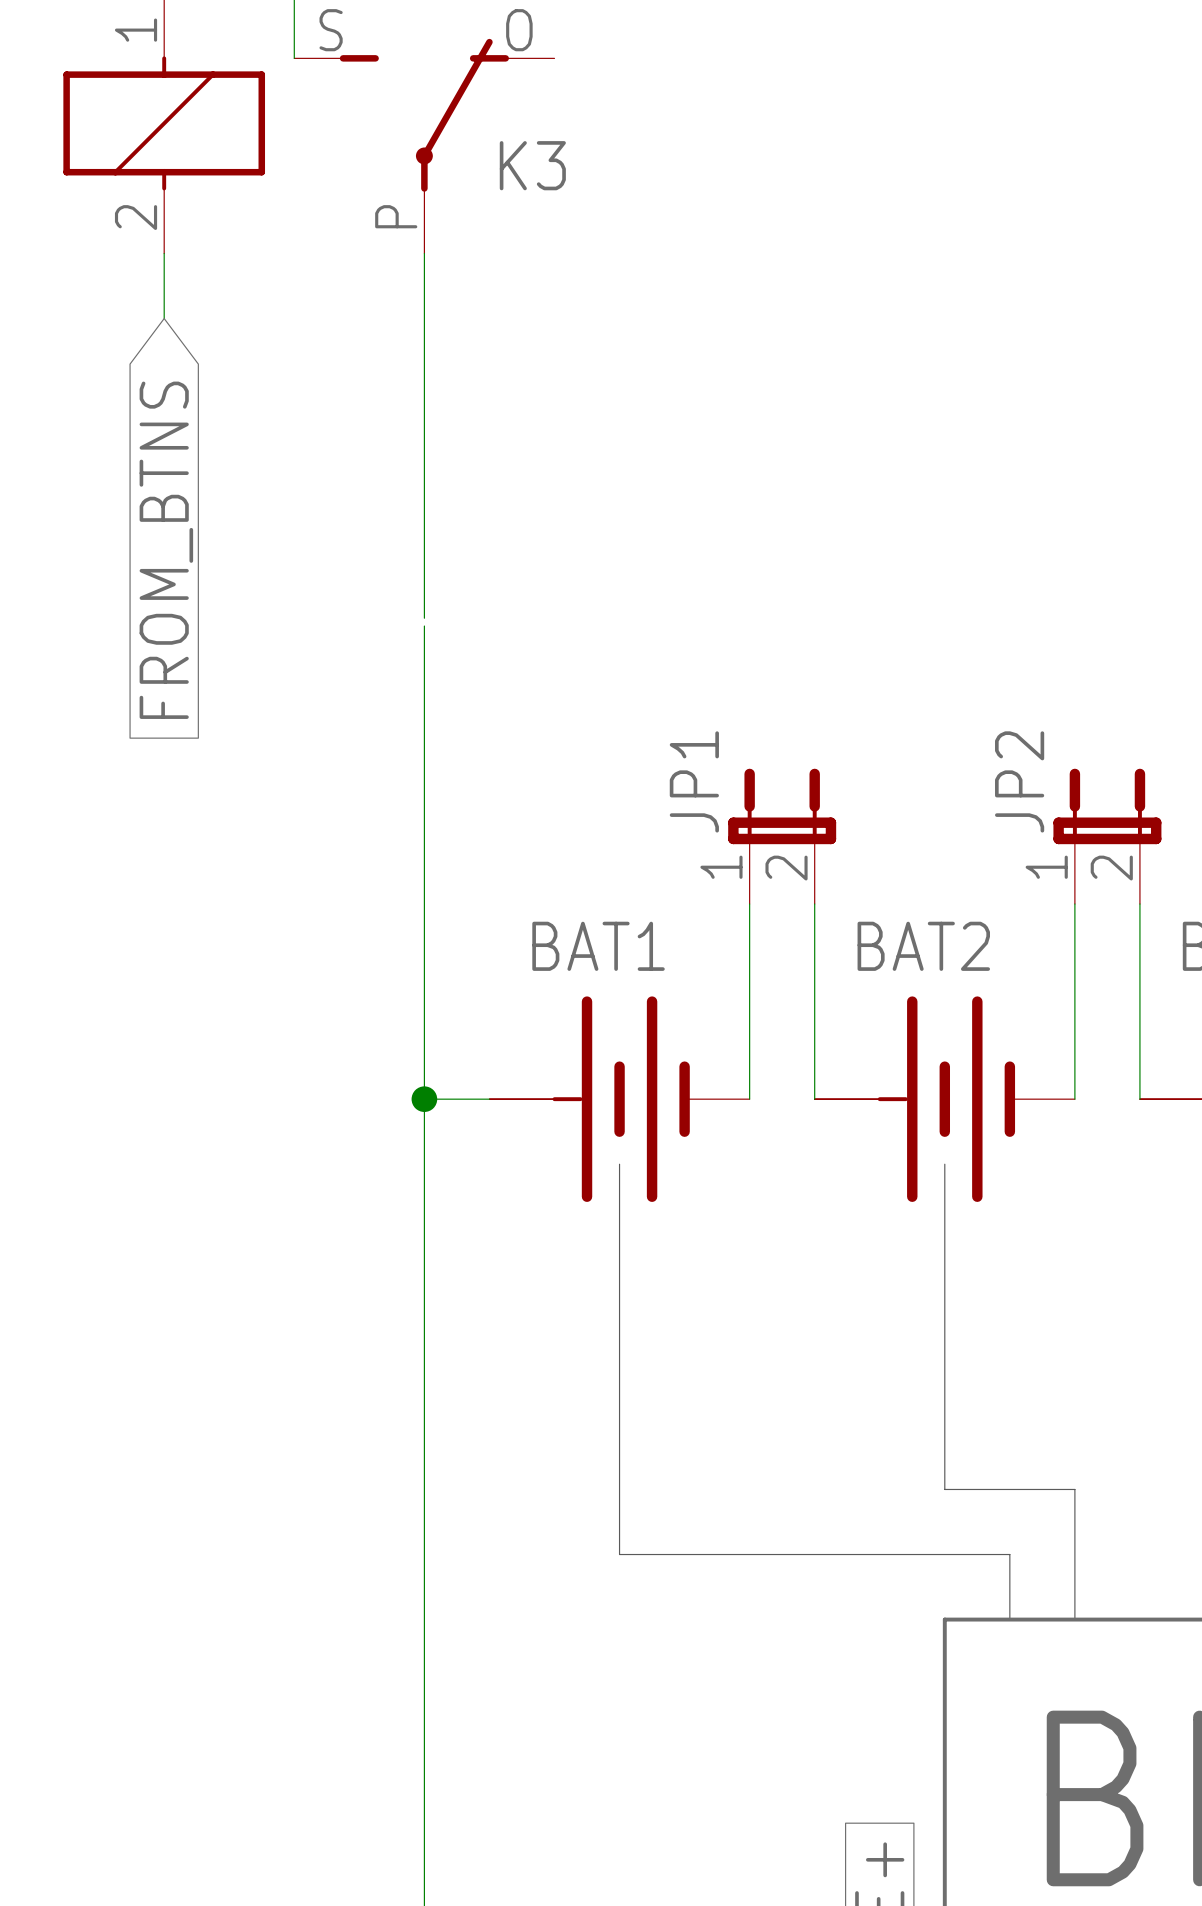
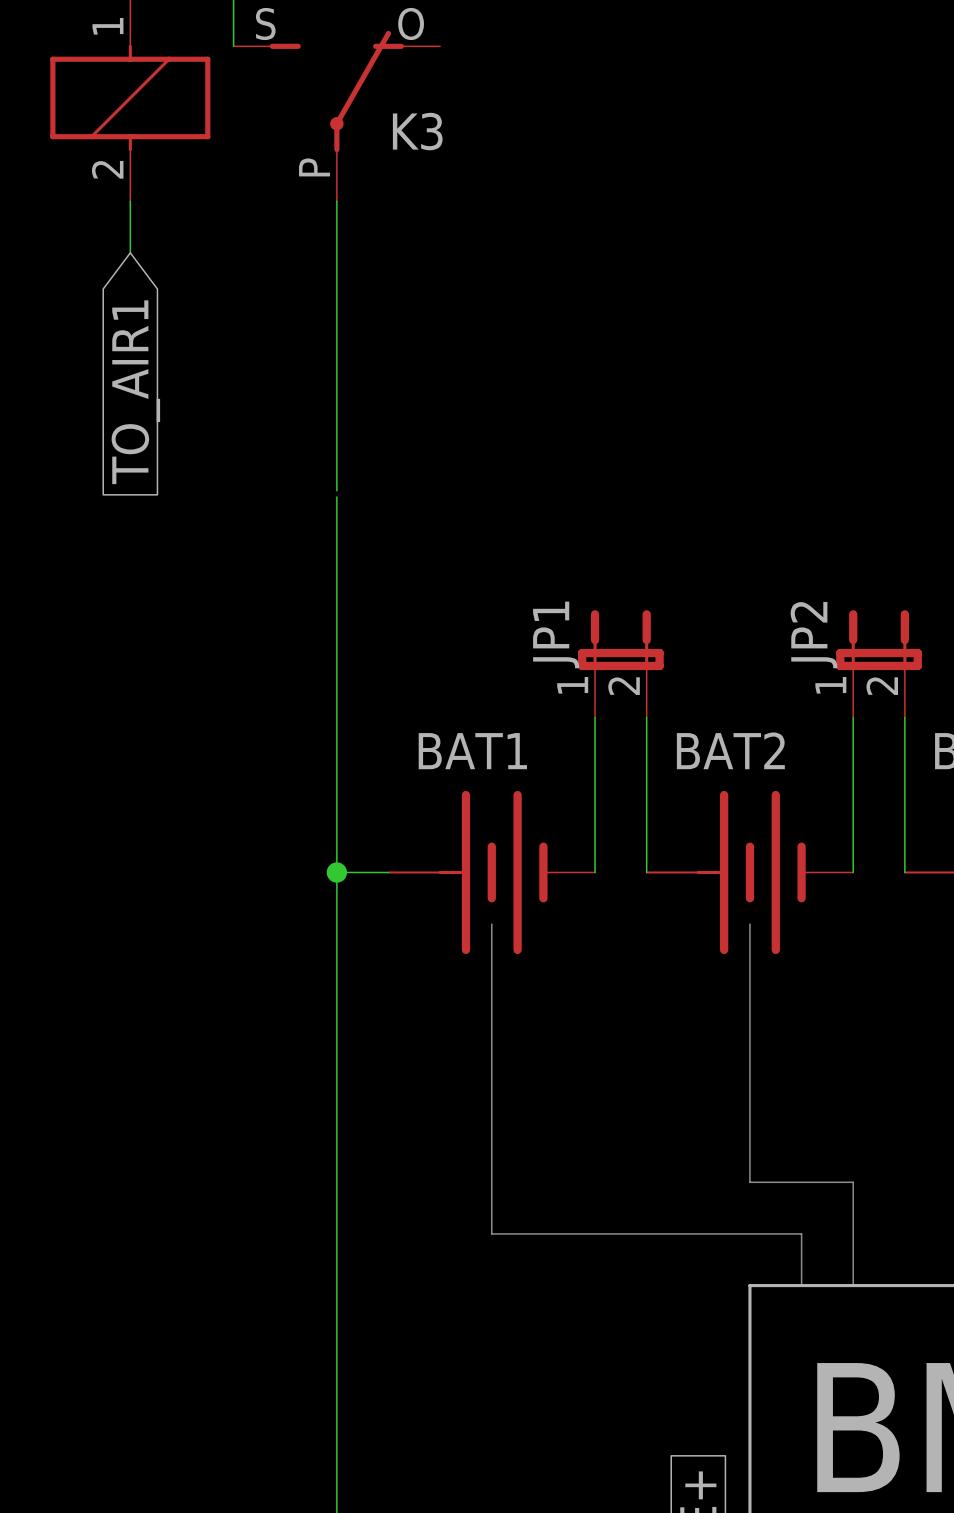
global label: FROM_BTNS (166, 550) -> TO_AIR1 (135, 392)

